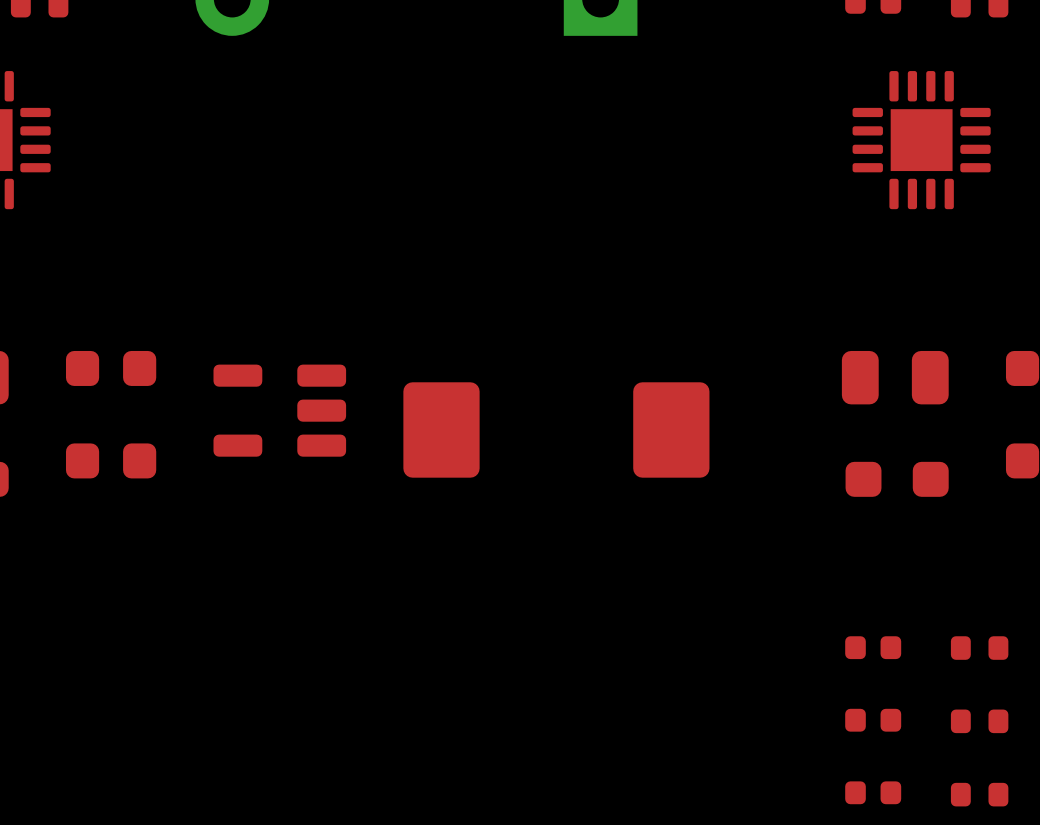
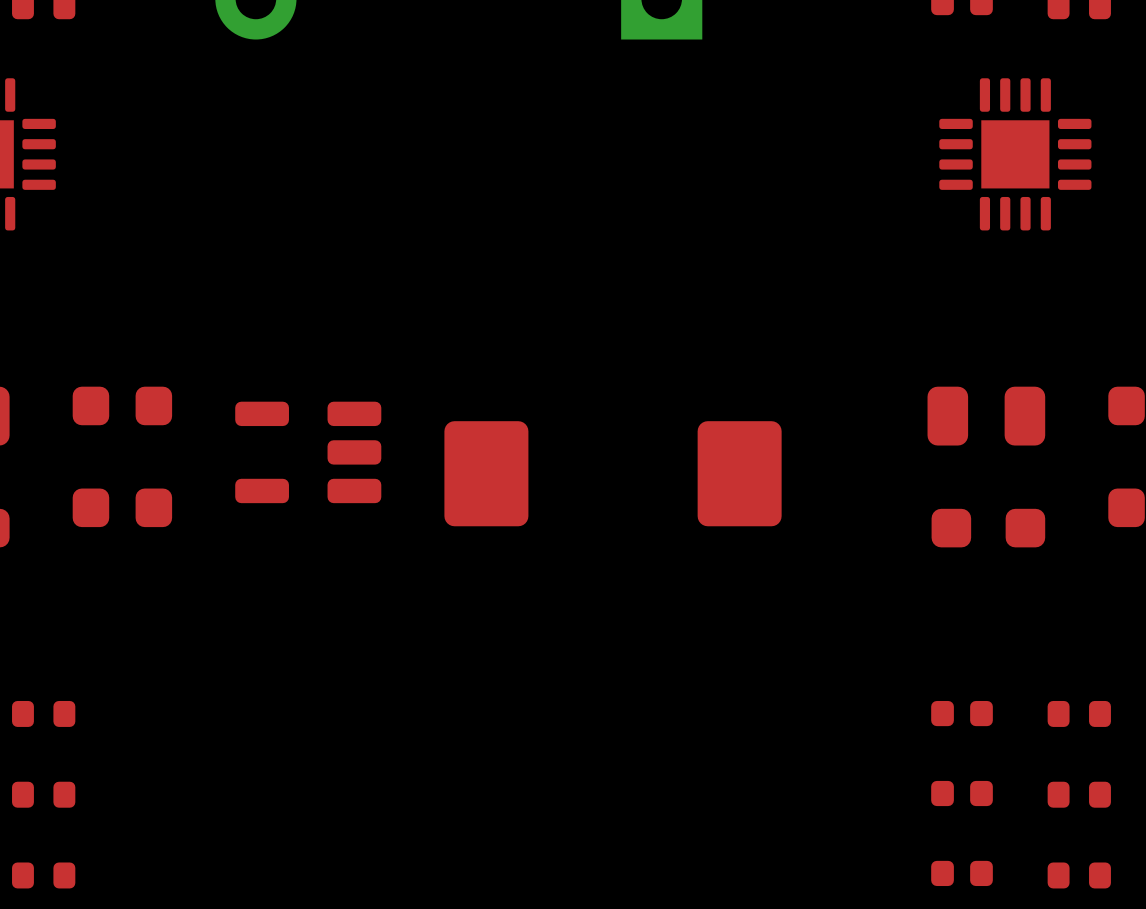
part: none -> (43, 713)
part: none -> (43, 794)
part: none -> (43, 875)

